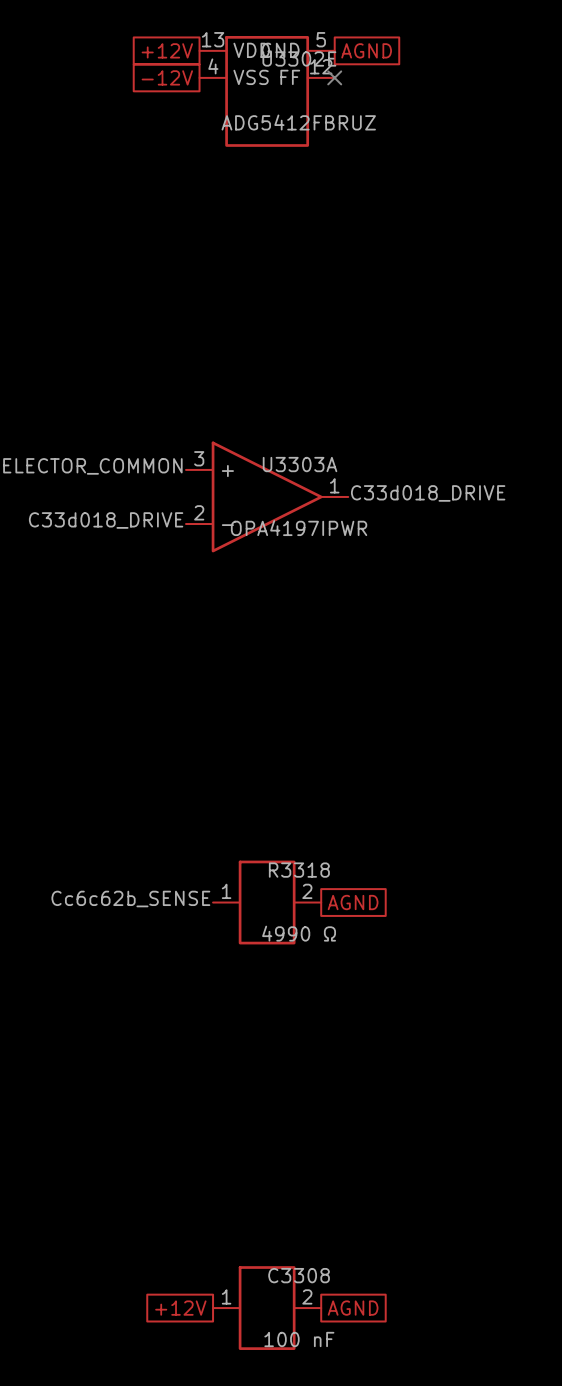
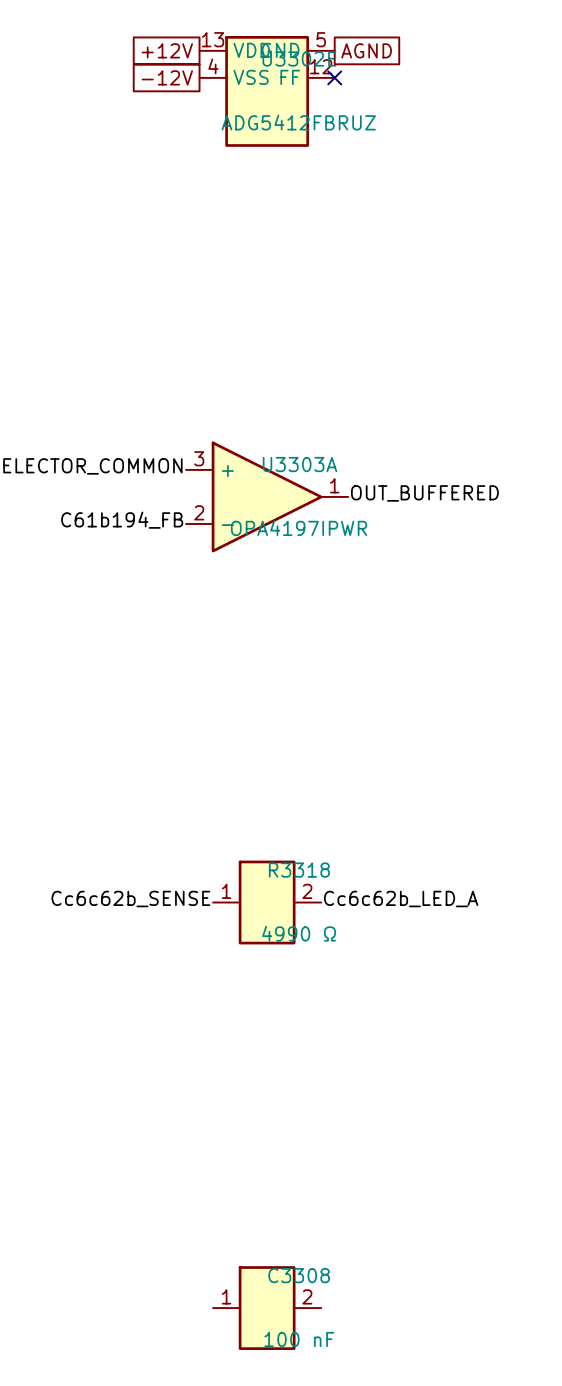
label: C33d018_DRIVE (428, 493) -> OUT_BUFFERED (424, 493)
label: C33d018_DRIVE (106, 520) -> C61b194_FB (122, 520)
label: none -> Cc6c62b_LED_A (401, 899)
global label: AGND (353, 902) -> none
global label: +12V (180, 1308) -> none
global label: AGND (353, 1308) -> none

